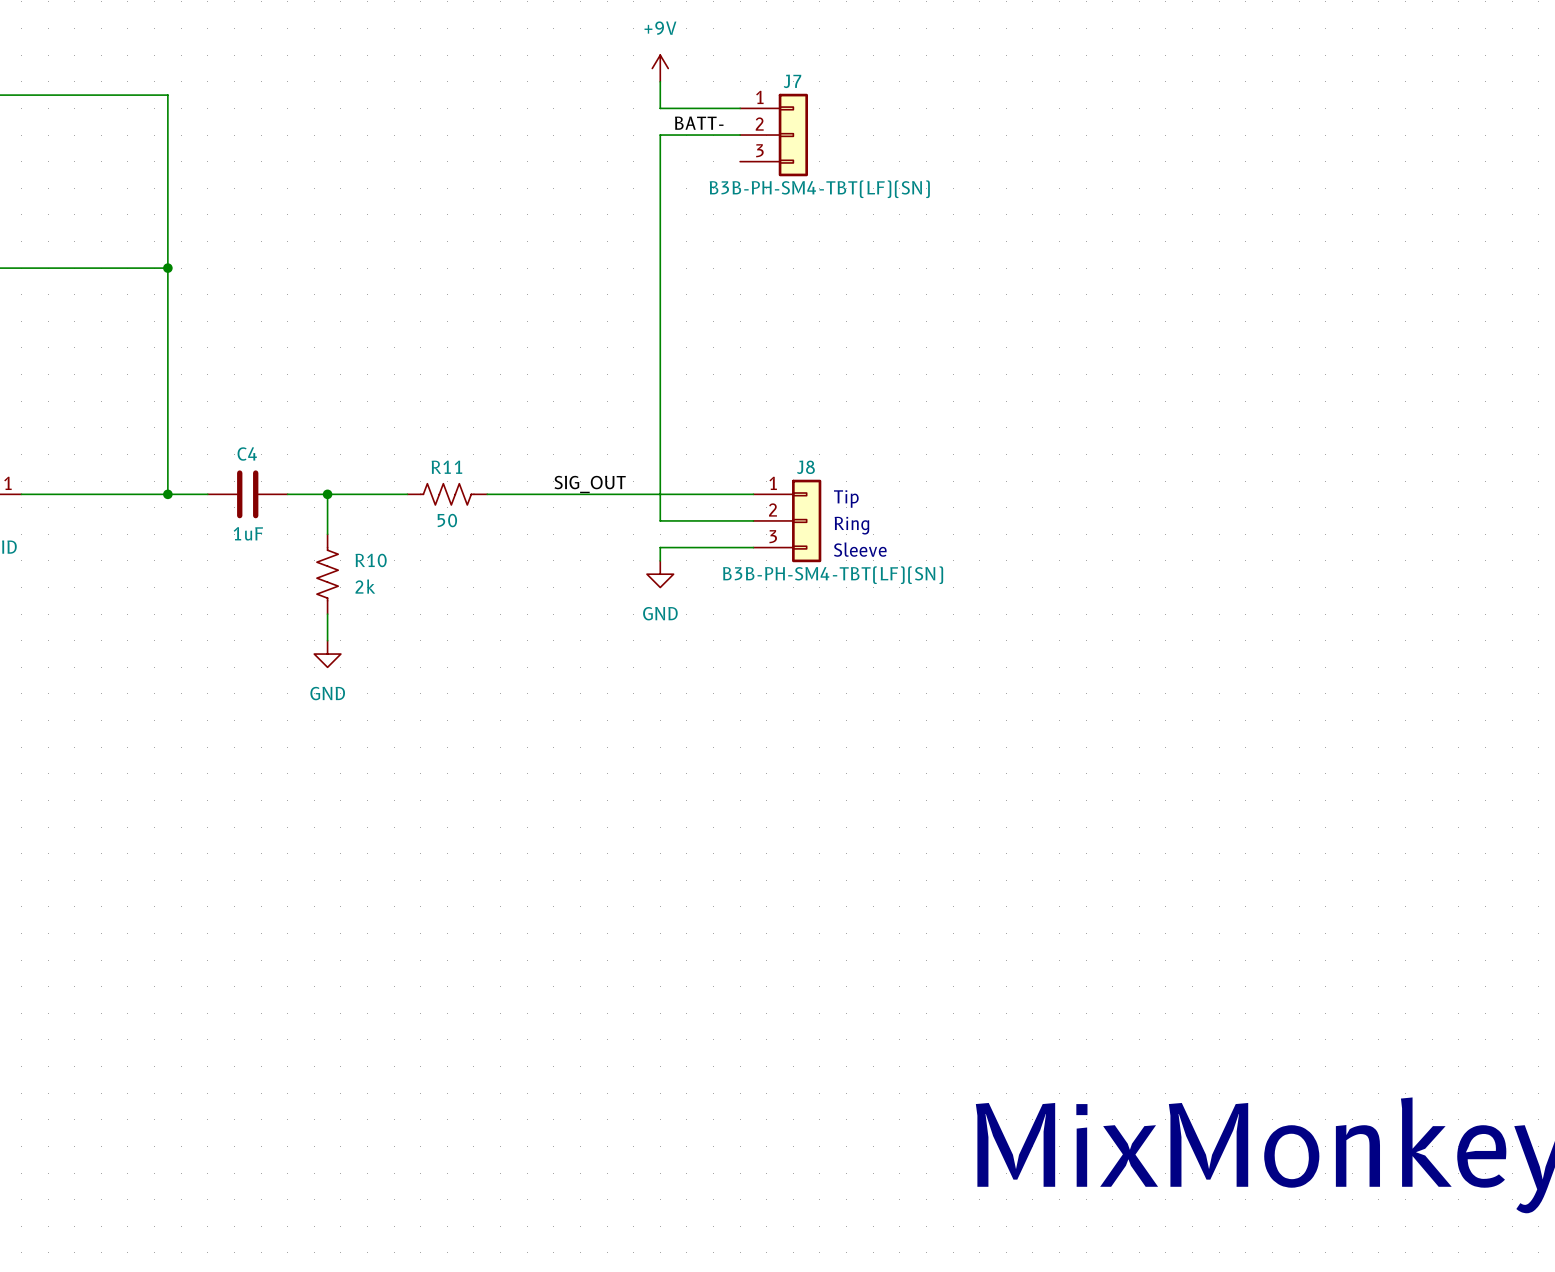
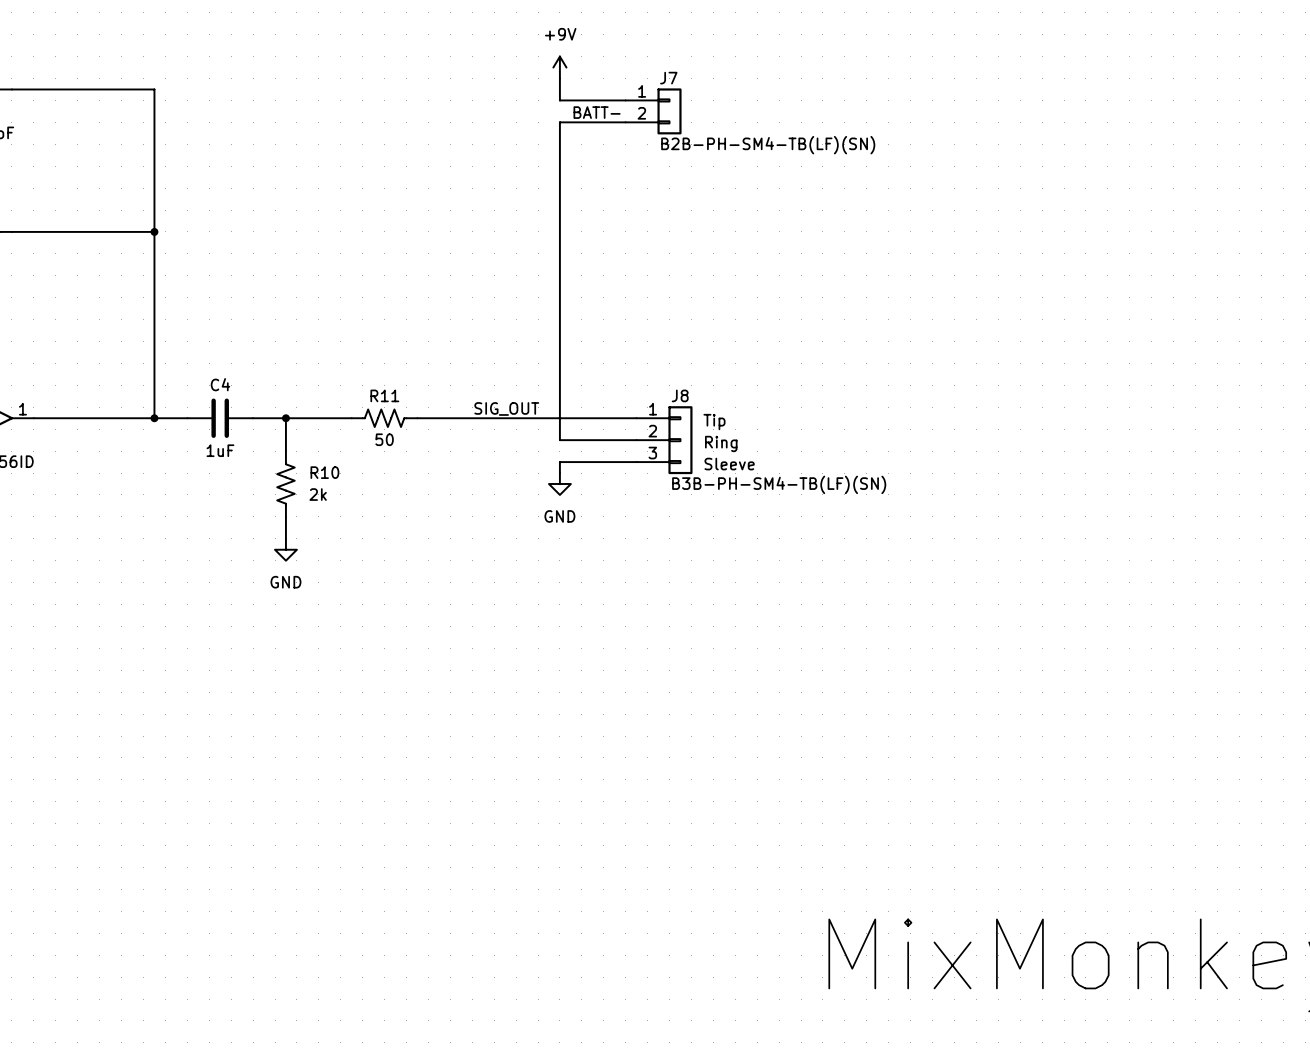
J7 symbol: [740, 93, 809, 177] -> [625, 88, 682, 135]
J7 value: B3B-PH-SM4-TBT(LF)(SN) (819, 189) -> B2B-PH-SM4-TB(LF)(SN) (768, 145)
J8 value: B3B-PH-SM4-TBT(LF)(SN) (833, 575) -> B3B-PH-SM4-TB(LF)(SN) (779, 484)

